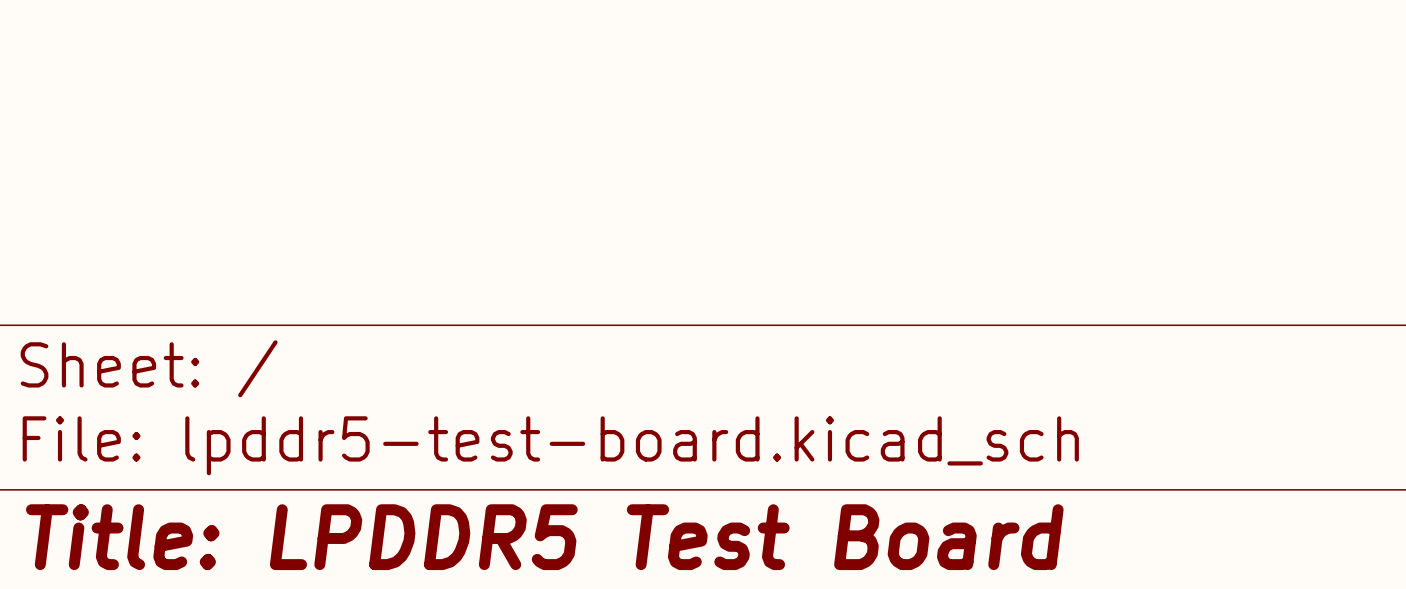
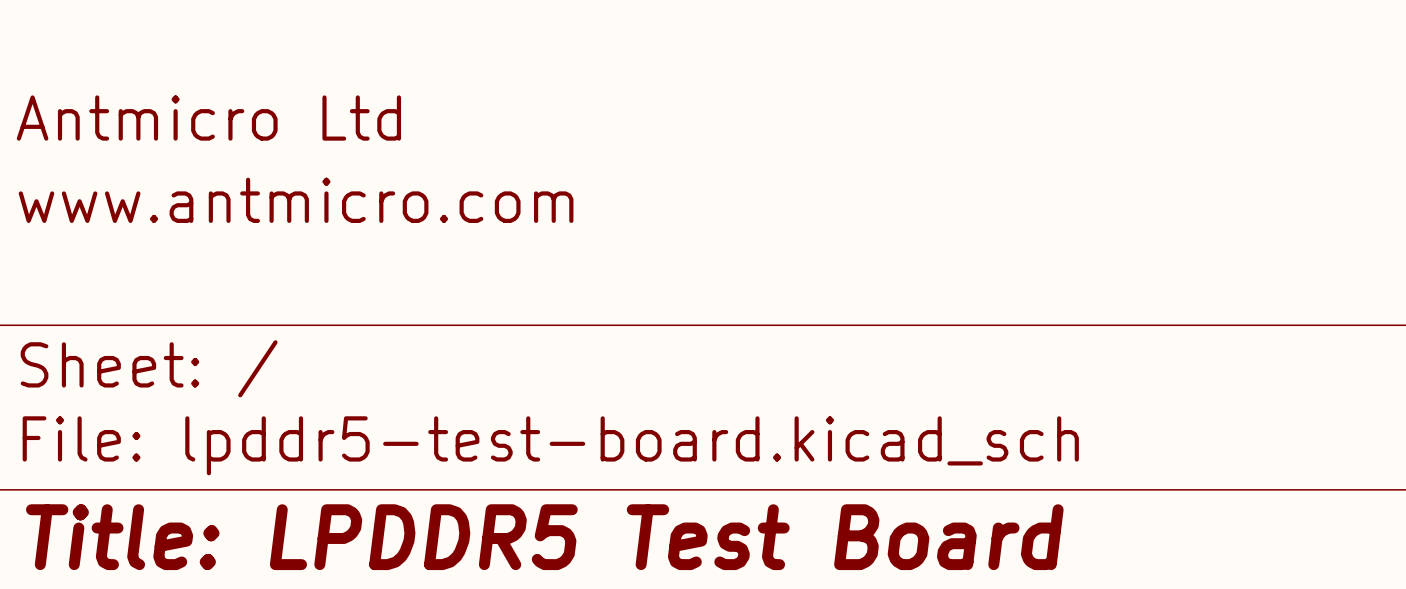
title block: none -> Antmicro Ltd (208, 118)
title block: none -> www.antmicro.com (296, 200)

